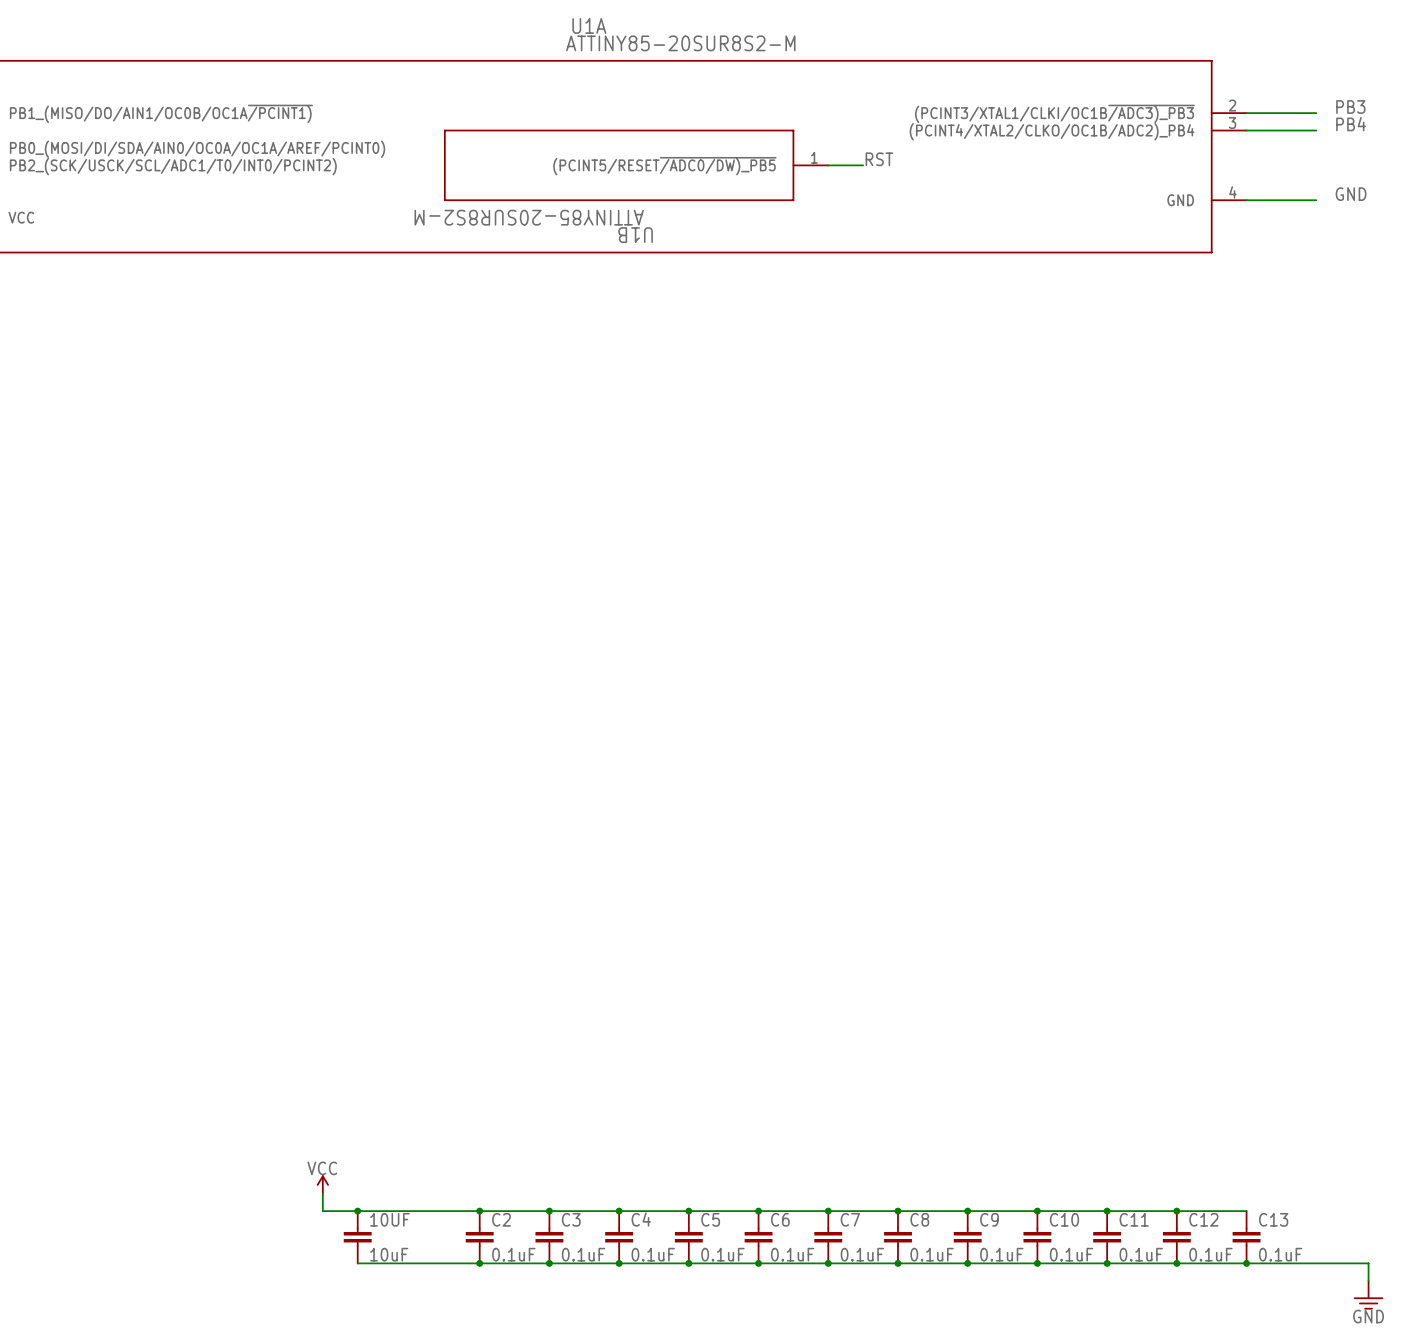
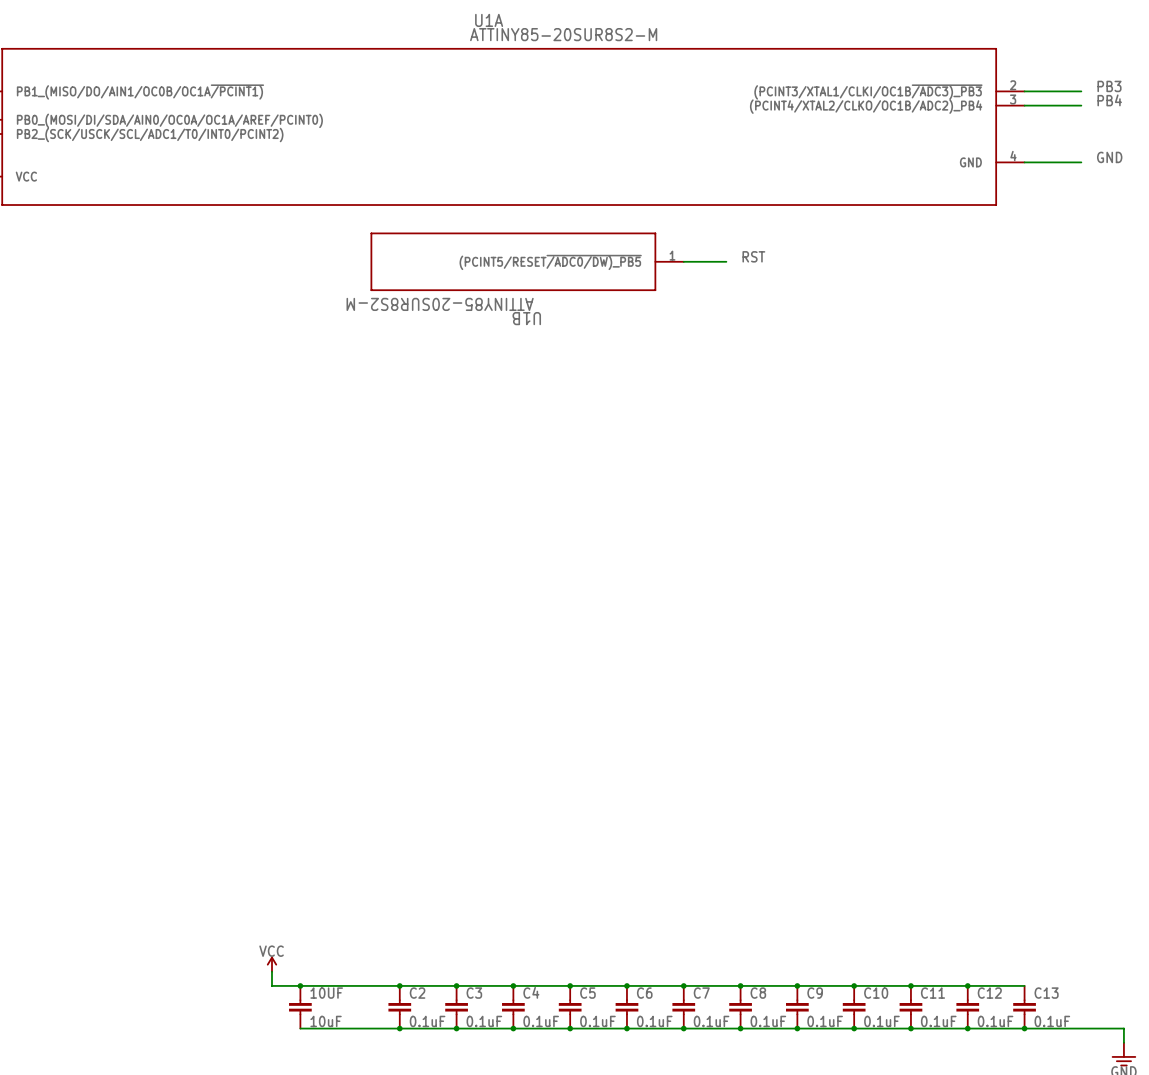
label position: RST (879, 159) -> RST (753, 256)
U1B position: (636, 165) -> (527, 261)
wire: (828, 165) (863, 165) -> none
wire: none -> (683, 261) (726, 261)

